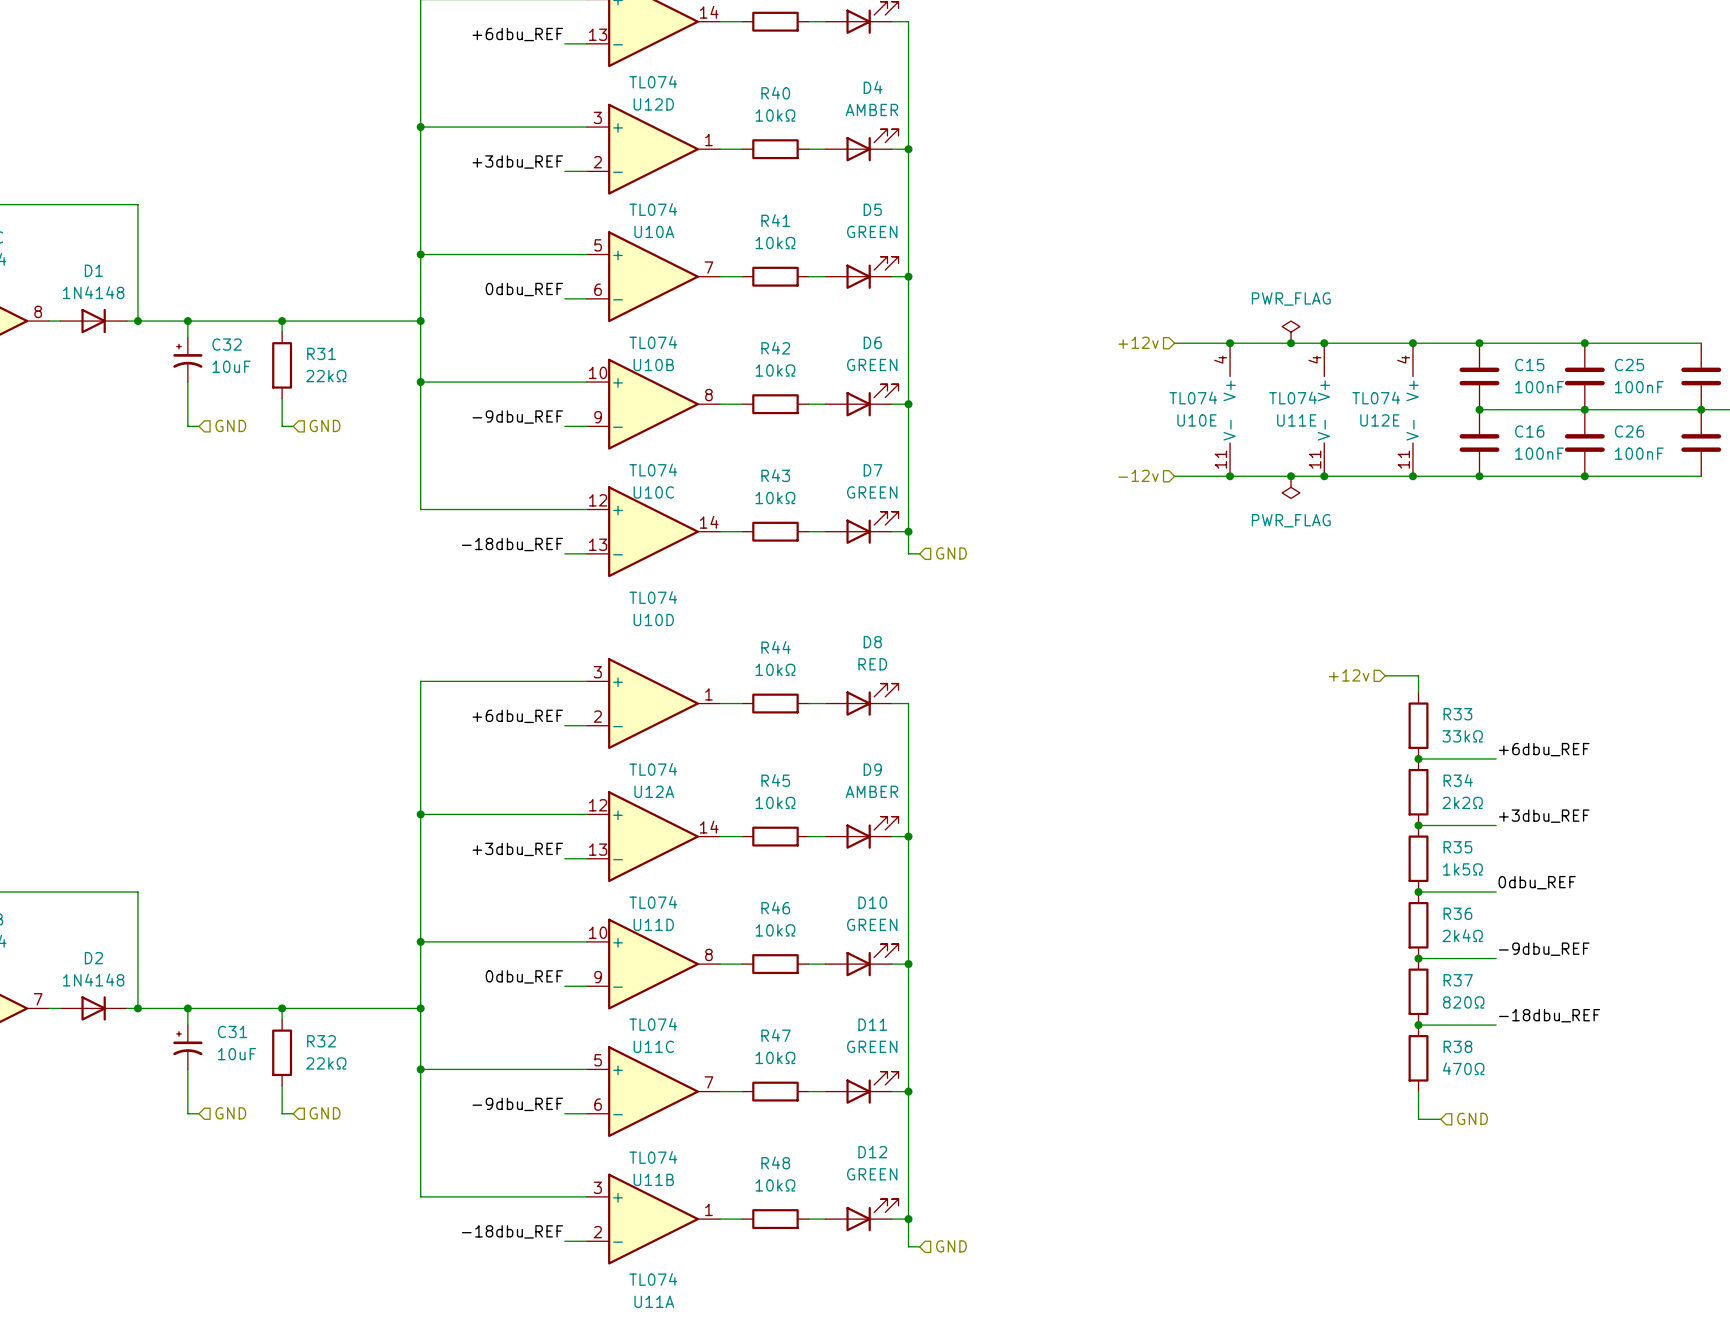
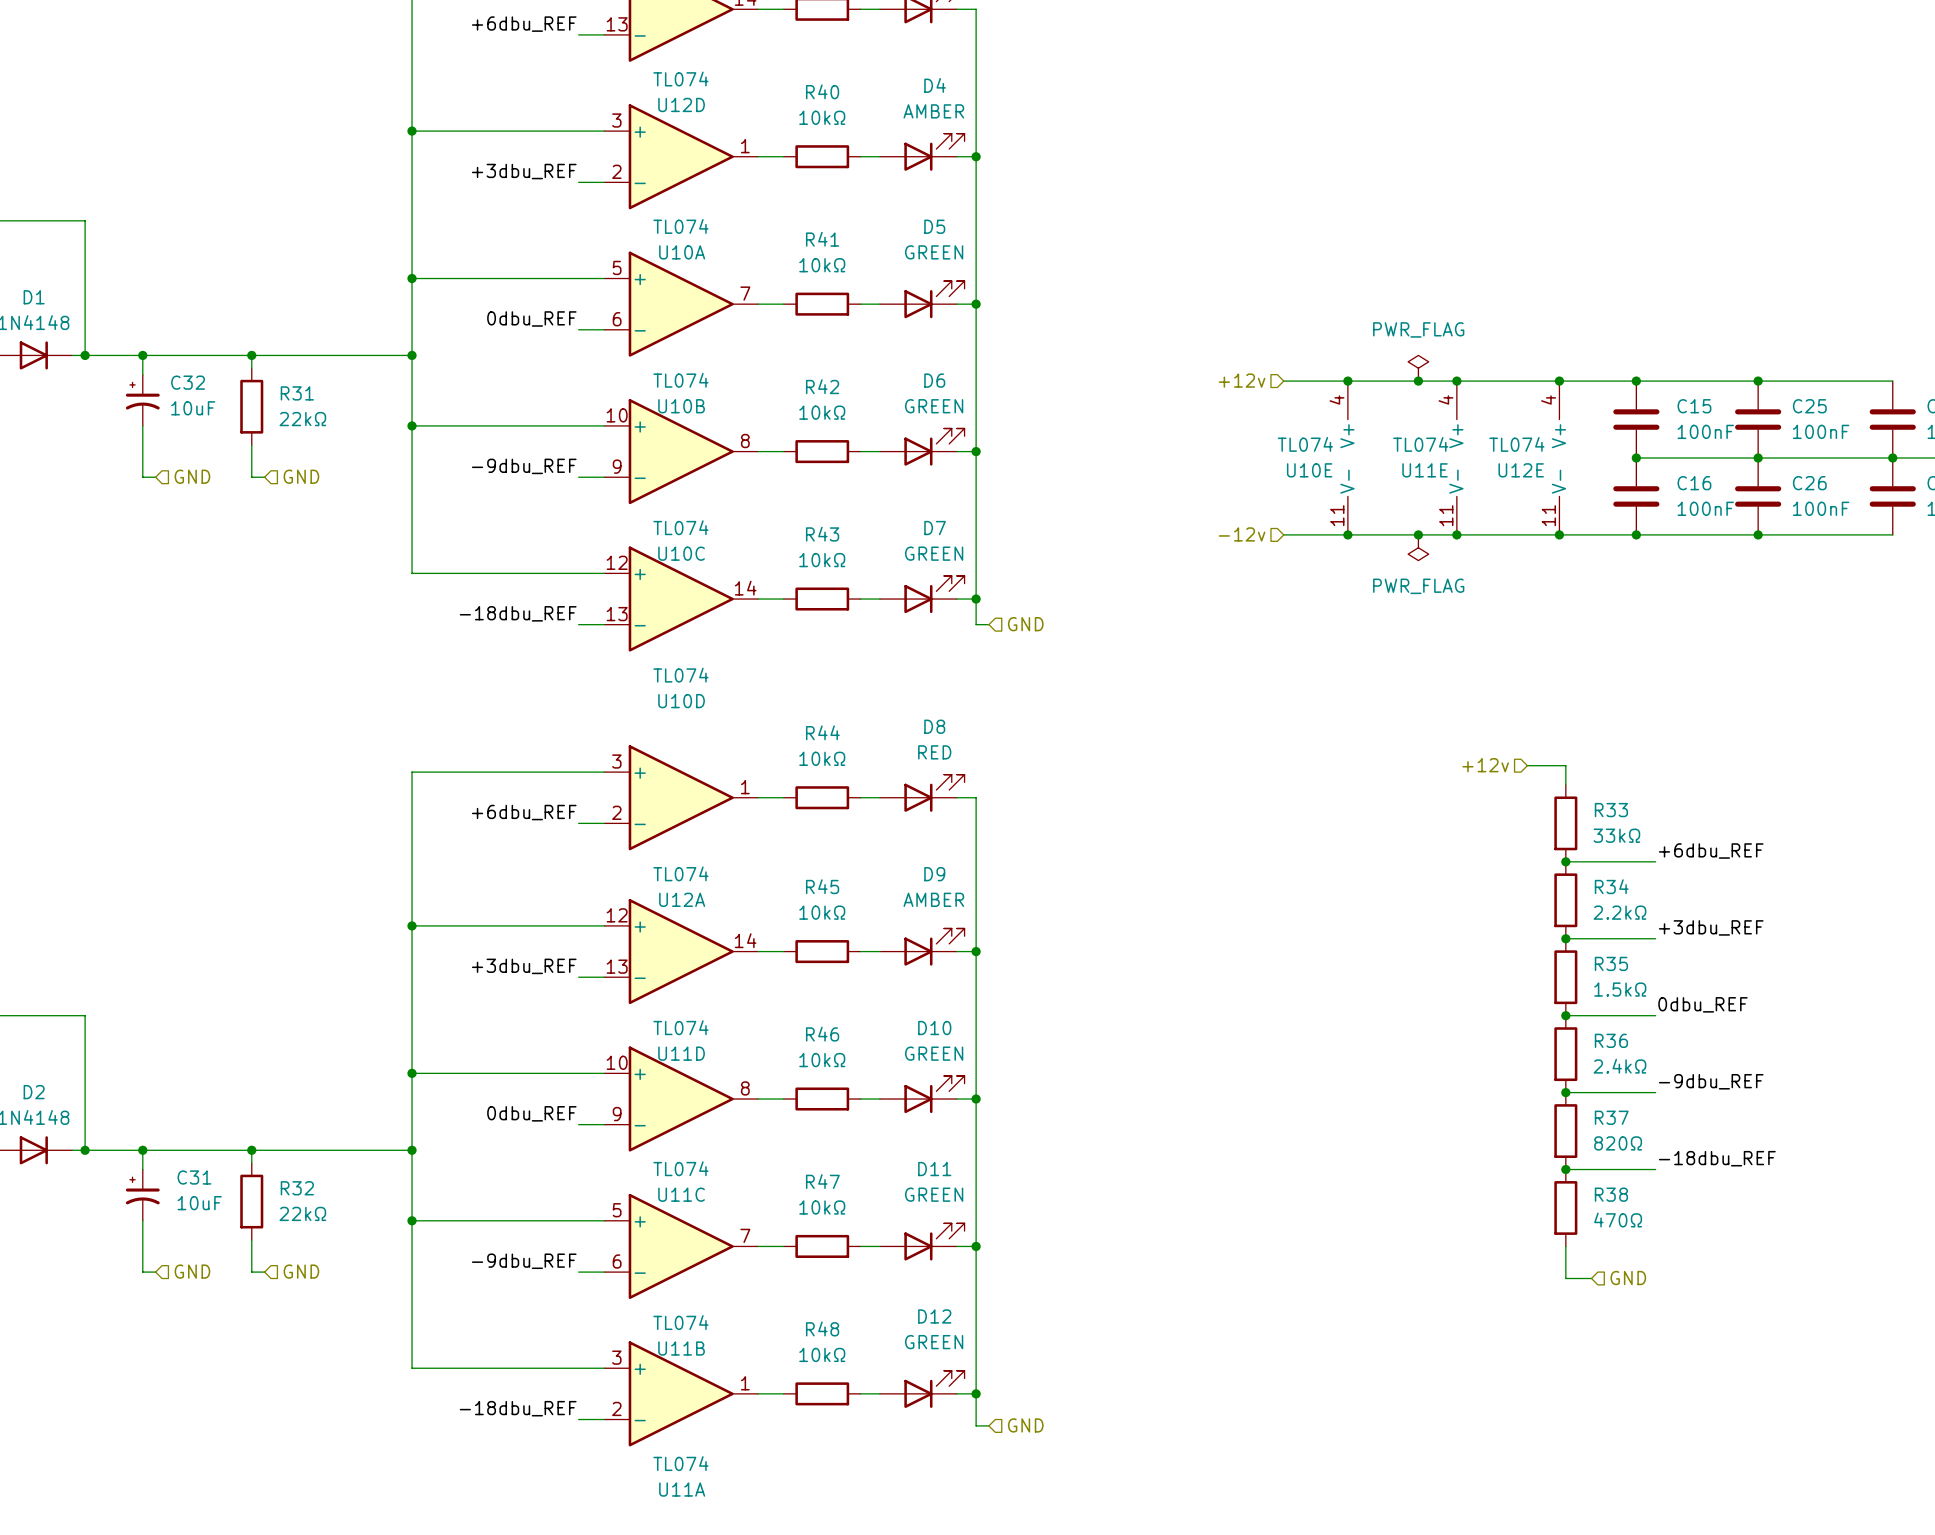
R34 value: 2k2Ω (1462, 802) -> 2.2kΩ (1619, 912)
R35 value: 1k5Ω (1462, 869) -> 1.5kΩ (1620, 989)
R36 value: 2k4Ω (1462, 935) -> 2.4kΩ (1619, 1066)

